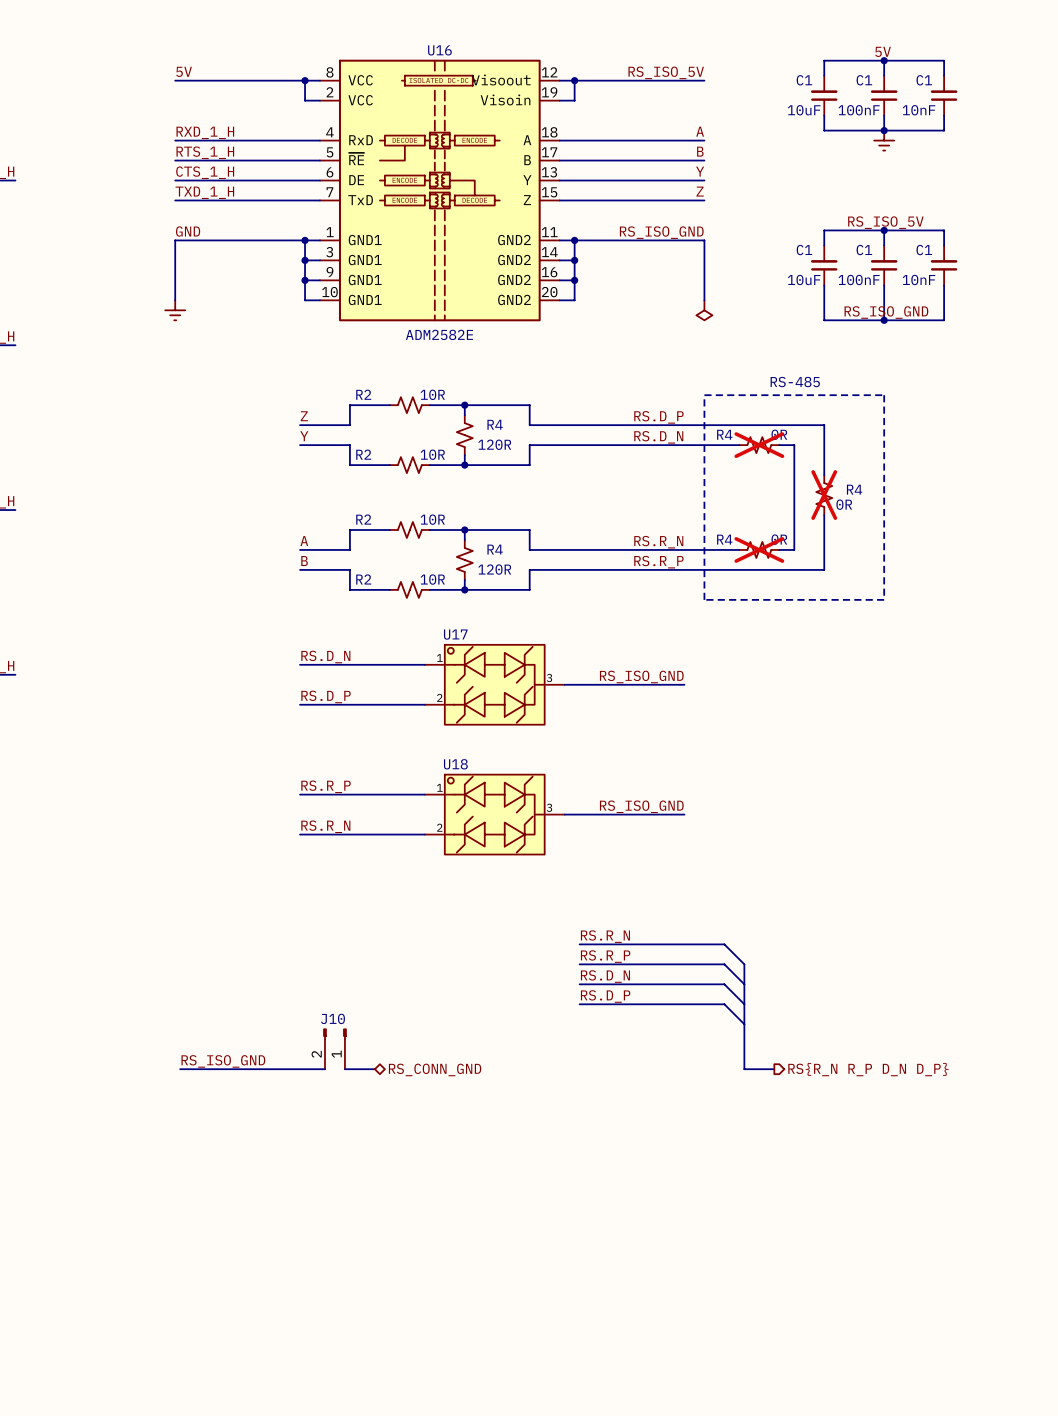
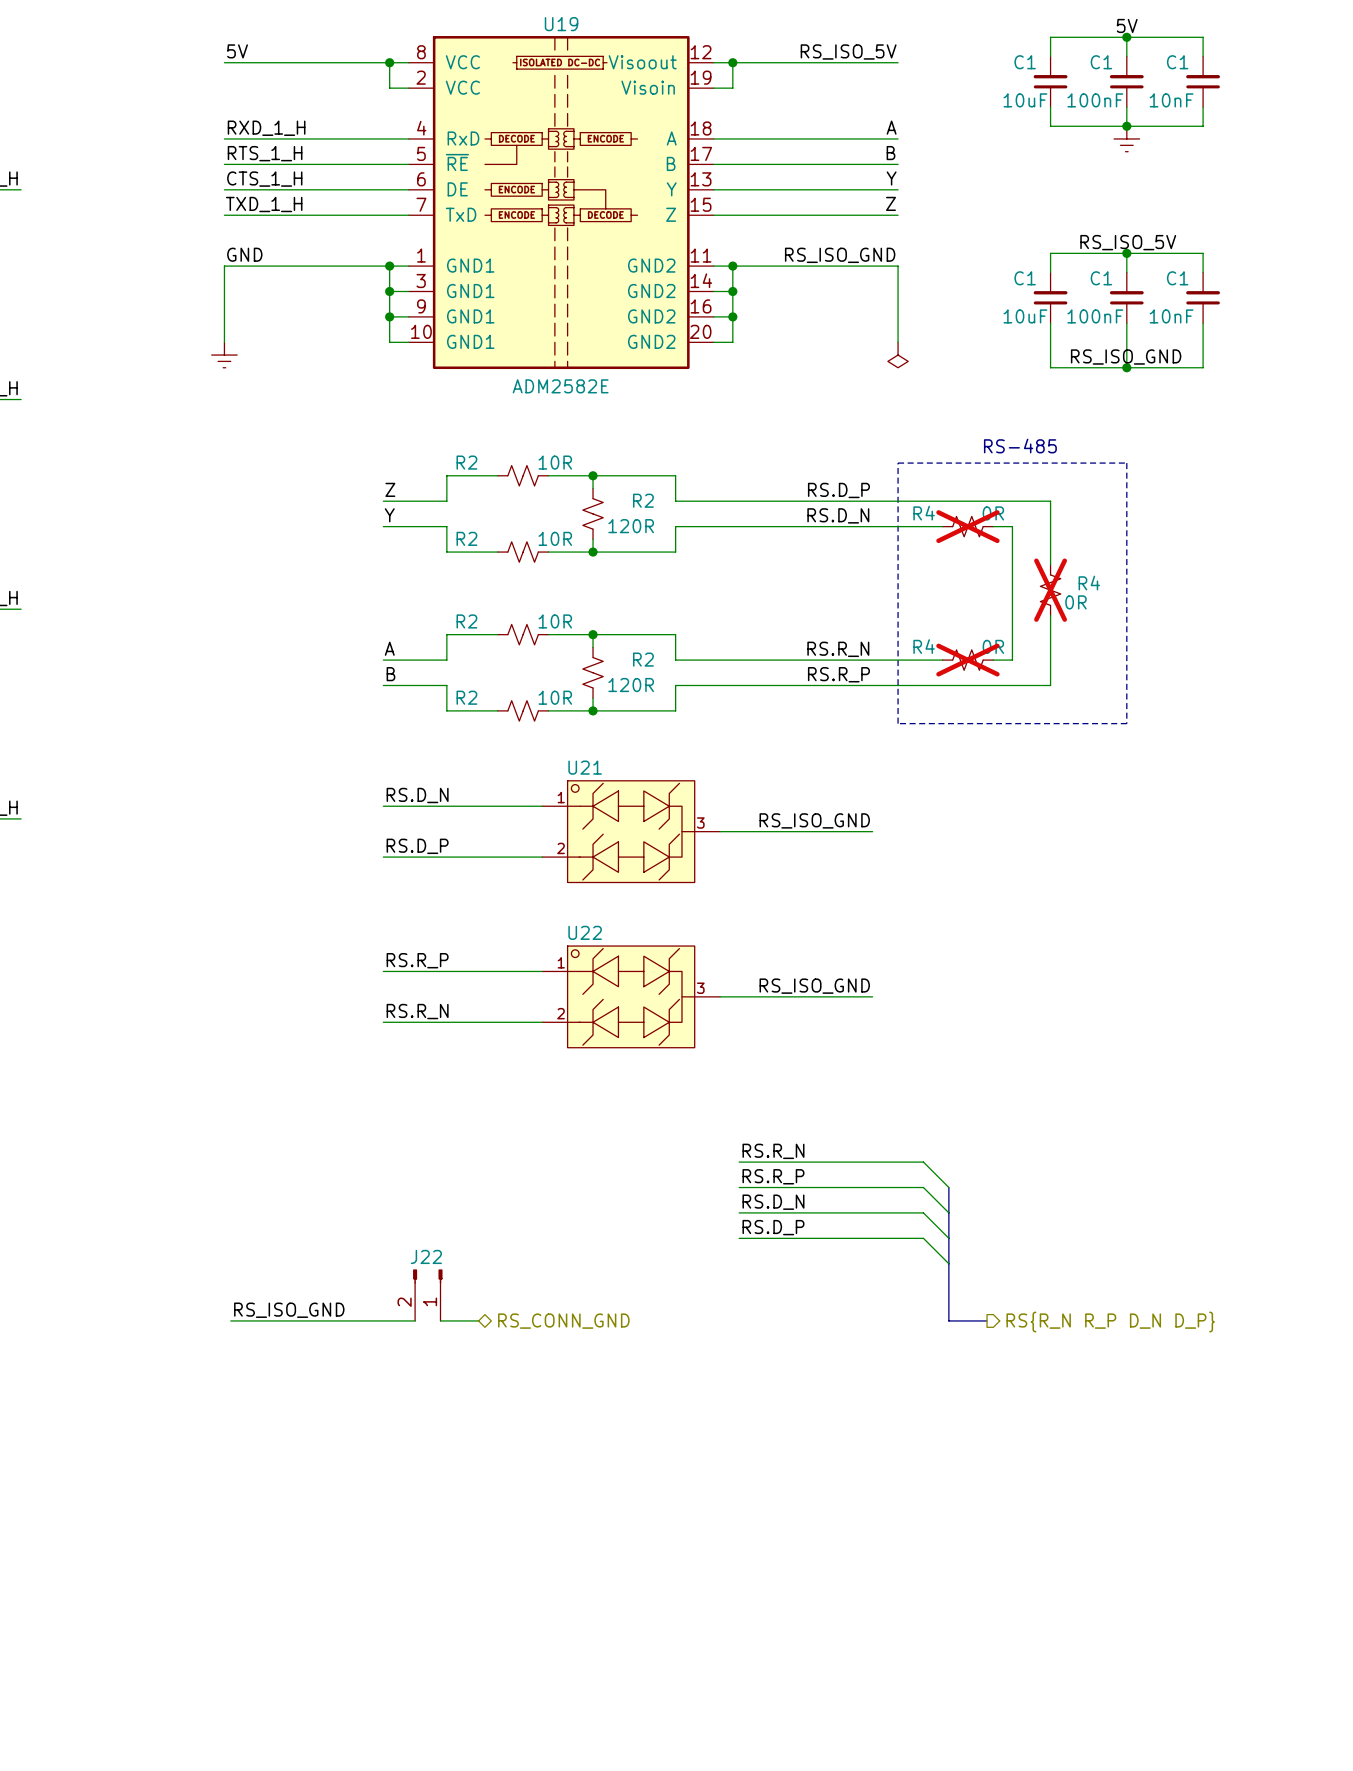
U16 name: U16 (439, 50) -> U19 (561, 24)
R4 name: R4 (495, 424) -> R2 (643, 500)
R4 name: R4 (495, 549) -> R2 (643, 659)
U17 name: U17 (455, 634) -> U21 (585, 767)
U18 name: U18 (455, 764) -> U22 (585, 932)
J10 name: J10 (333, 1018) -> J22 (426, 1256)

